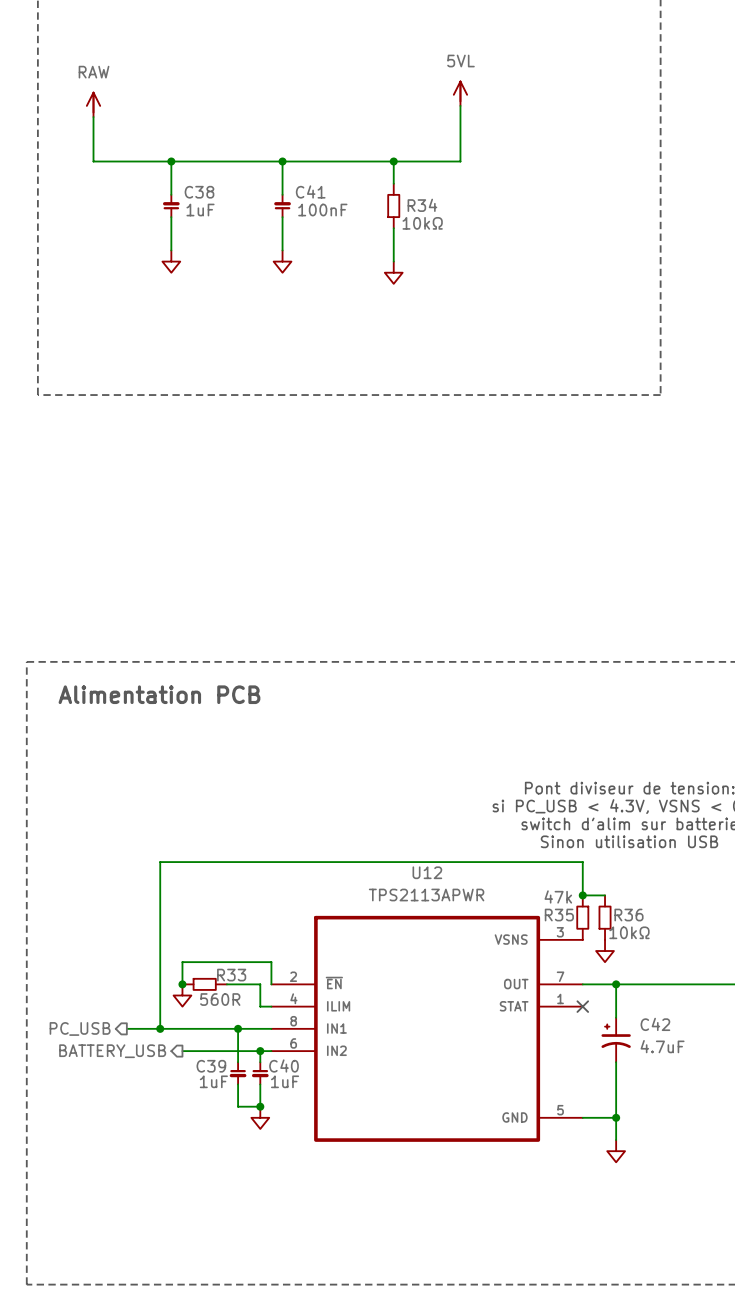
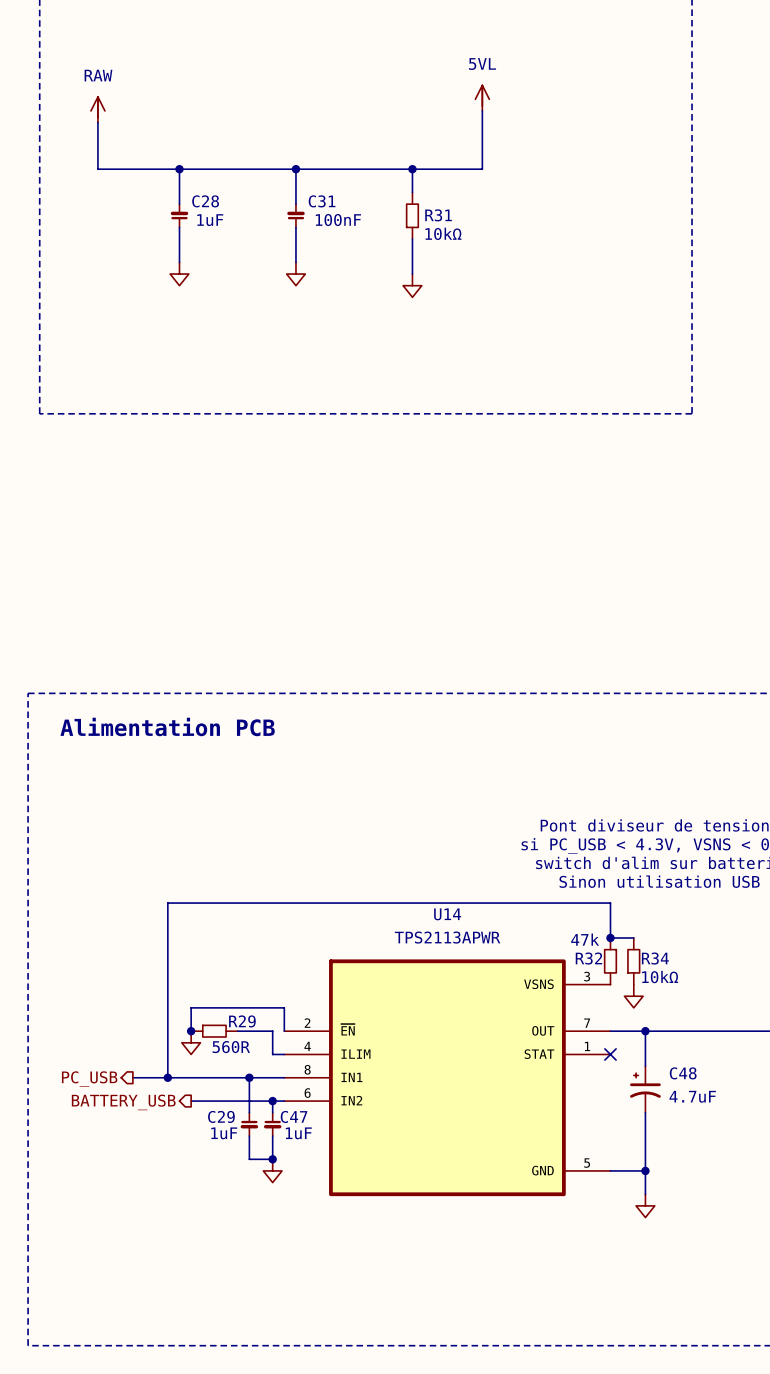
C41 name: C41 (310, 191) -> C31 (322, 201)
C38 name: C38 (199, 192) -> C28 (205, 201)
R34 name: R34 (422, 205) -> R31 (438, 215)
U12 name: U12 (427, 872) -> U14 (447, 914)
R35 name: R35 (559, 915) -> R32 (588, 958)
R36 name: R36 (628, 915) -> R34 (655, 958)
R33 name: R33 (231, 975) -> R29 (242, 1021)
C42 name: C42 (655, 1024) -> C48 (683, 1073)
C40 name: C40 (284, 1065) -> C47 (294, 1116)
C39 name: C39 (211, 1066) -> C29 (221, 1116)

